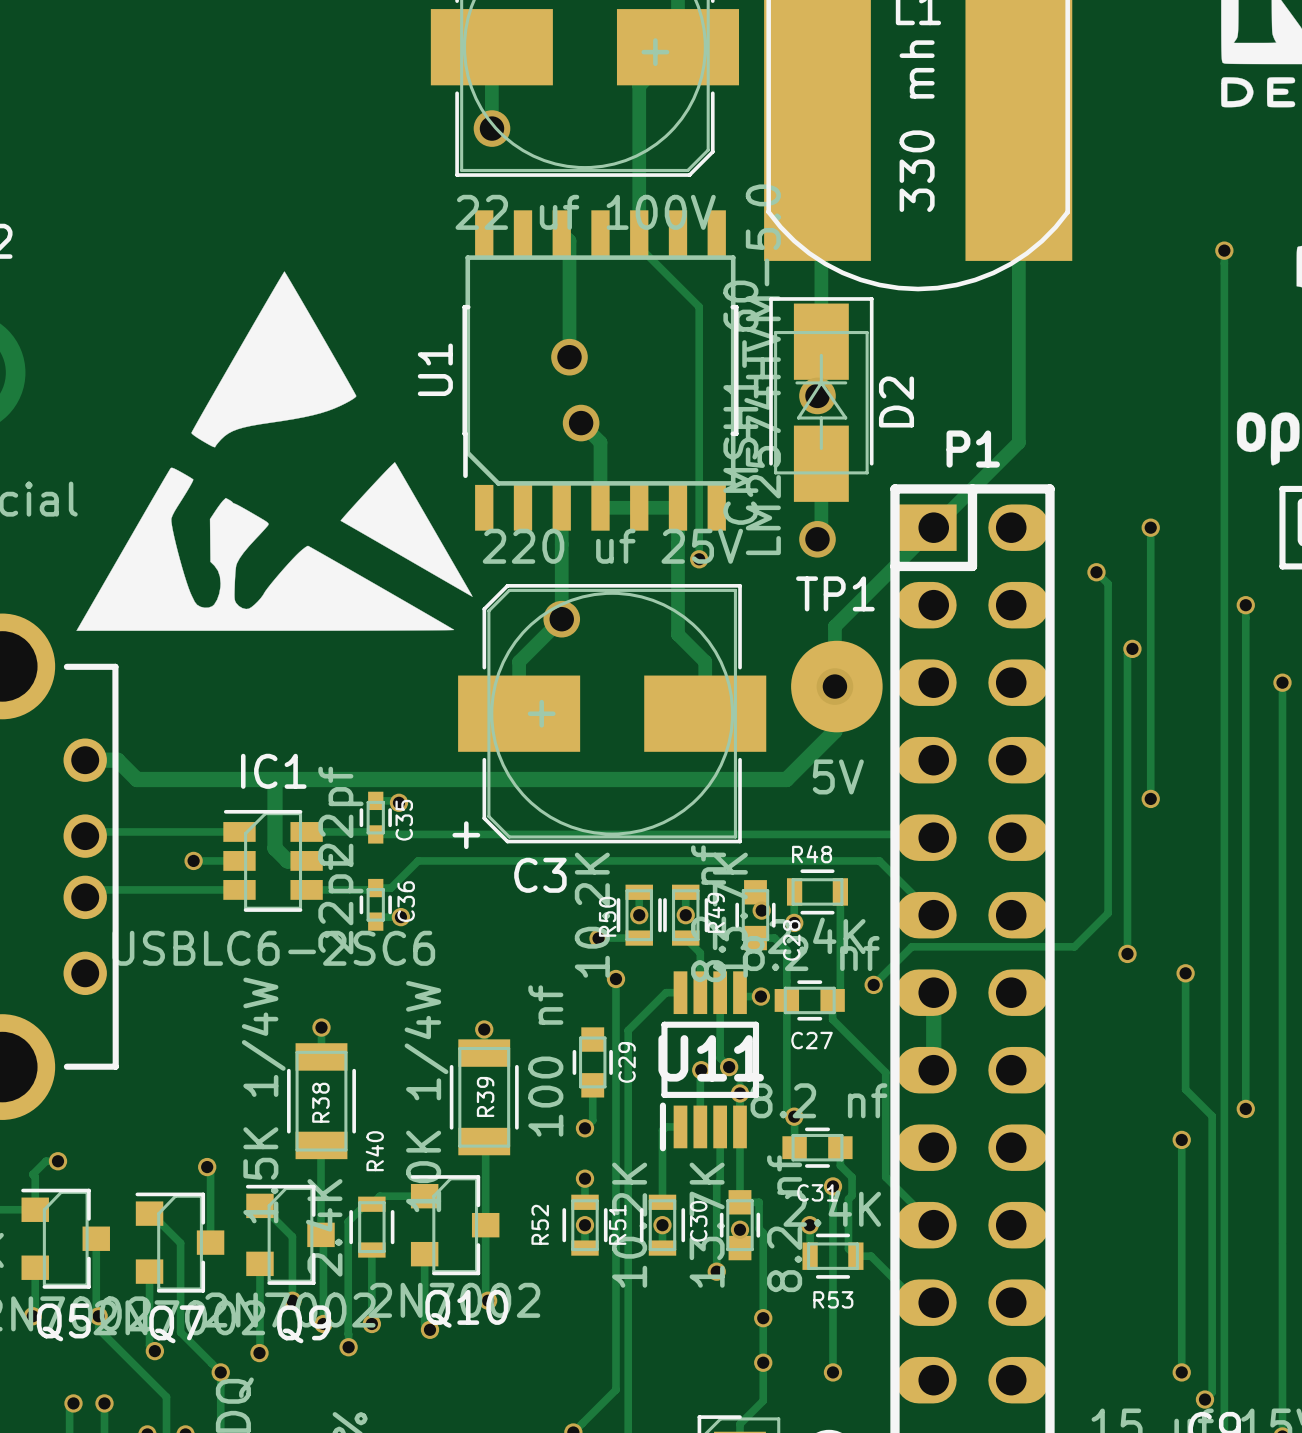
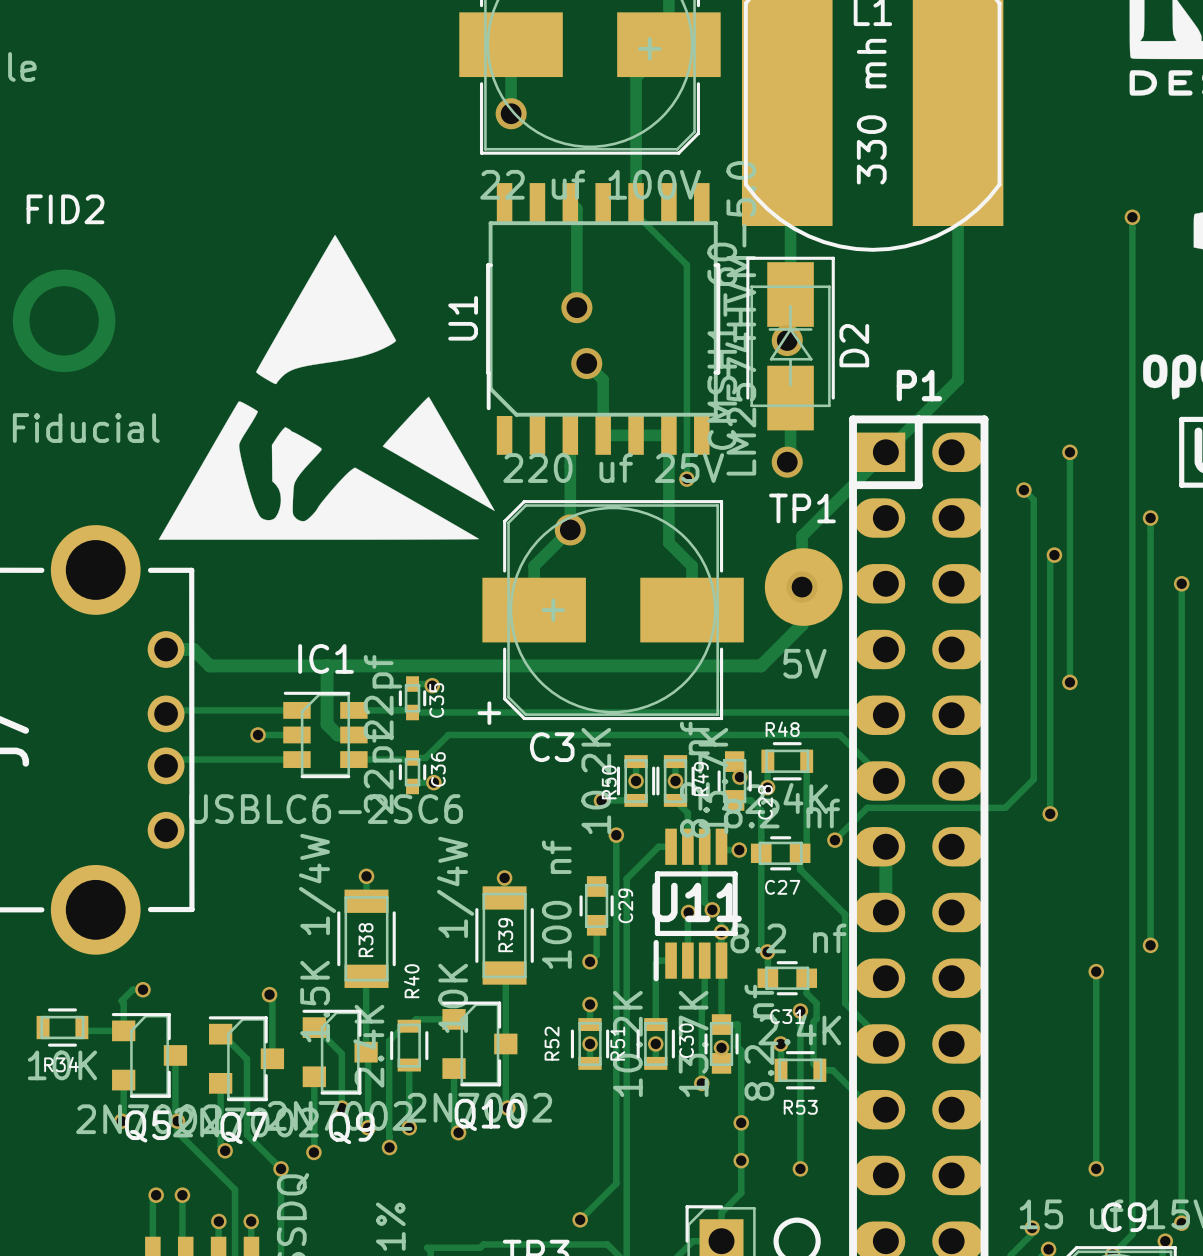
track: (1185, 973) (1185, 1089) (1212, 1116) (1212, 1392) (1204, 1399) -> none
via: (1185, 973) -> none
via: (1204, 1399) -> none

